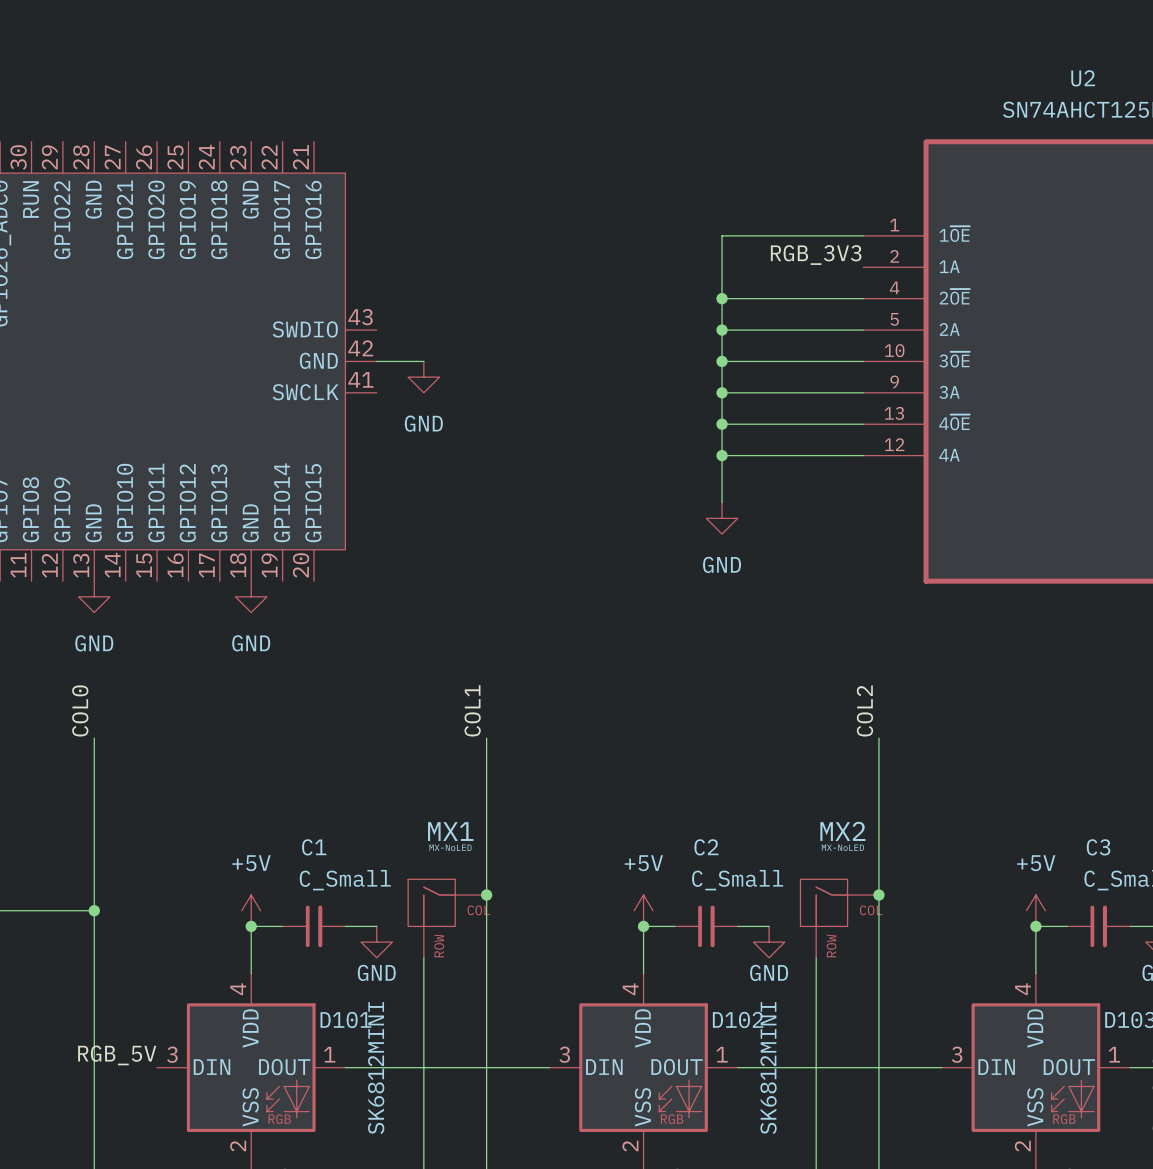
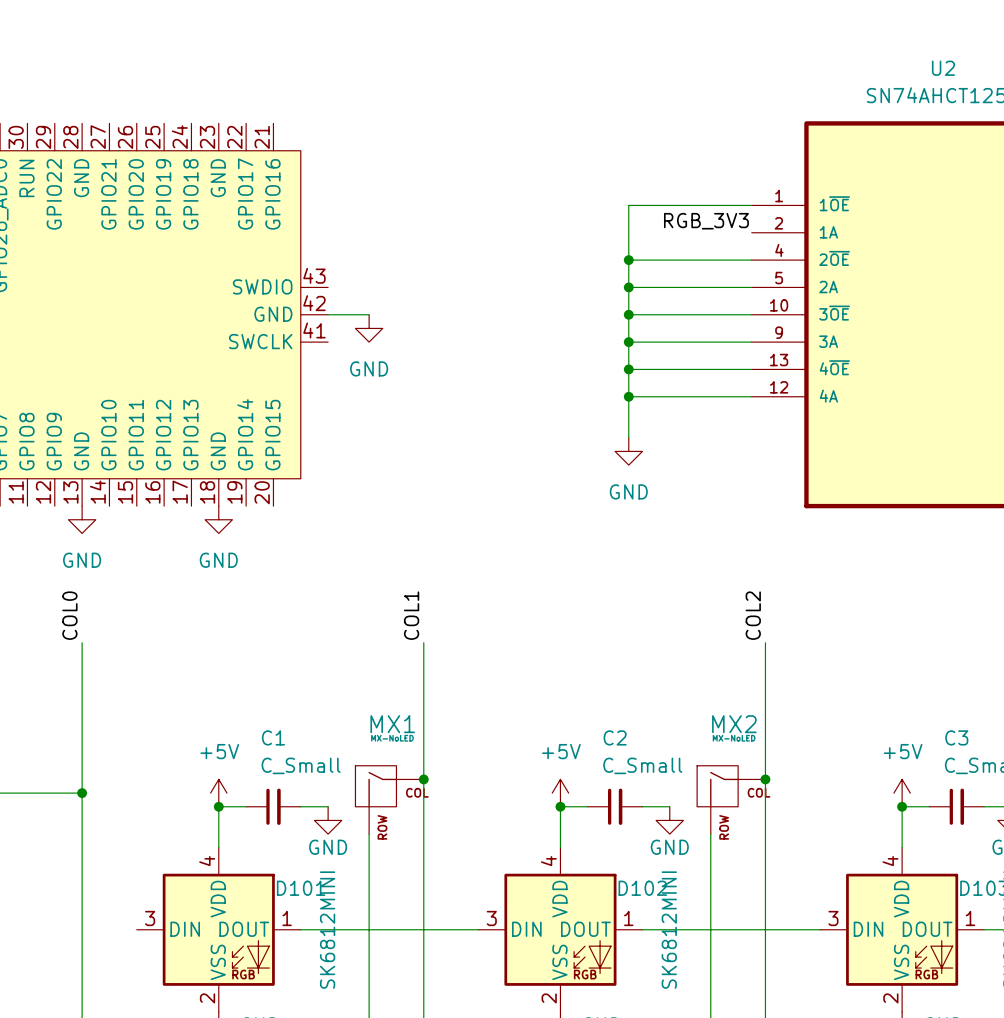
label: RGB_5V (117, 1055) -> none

